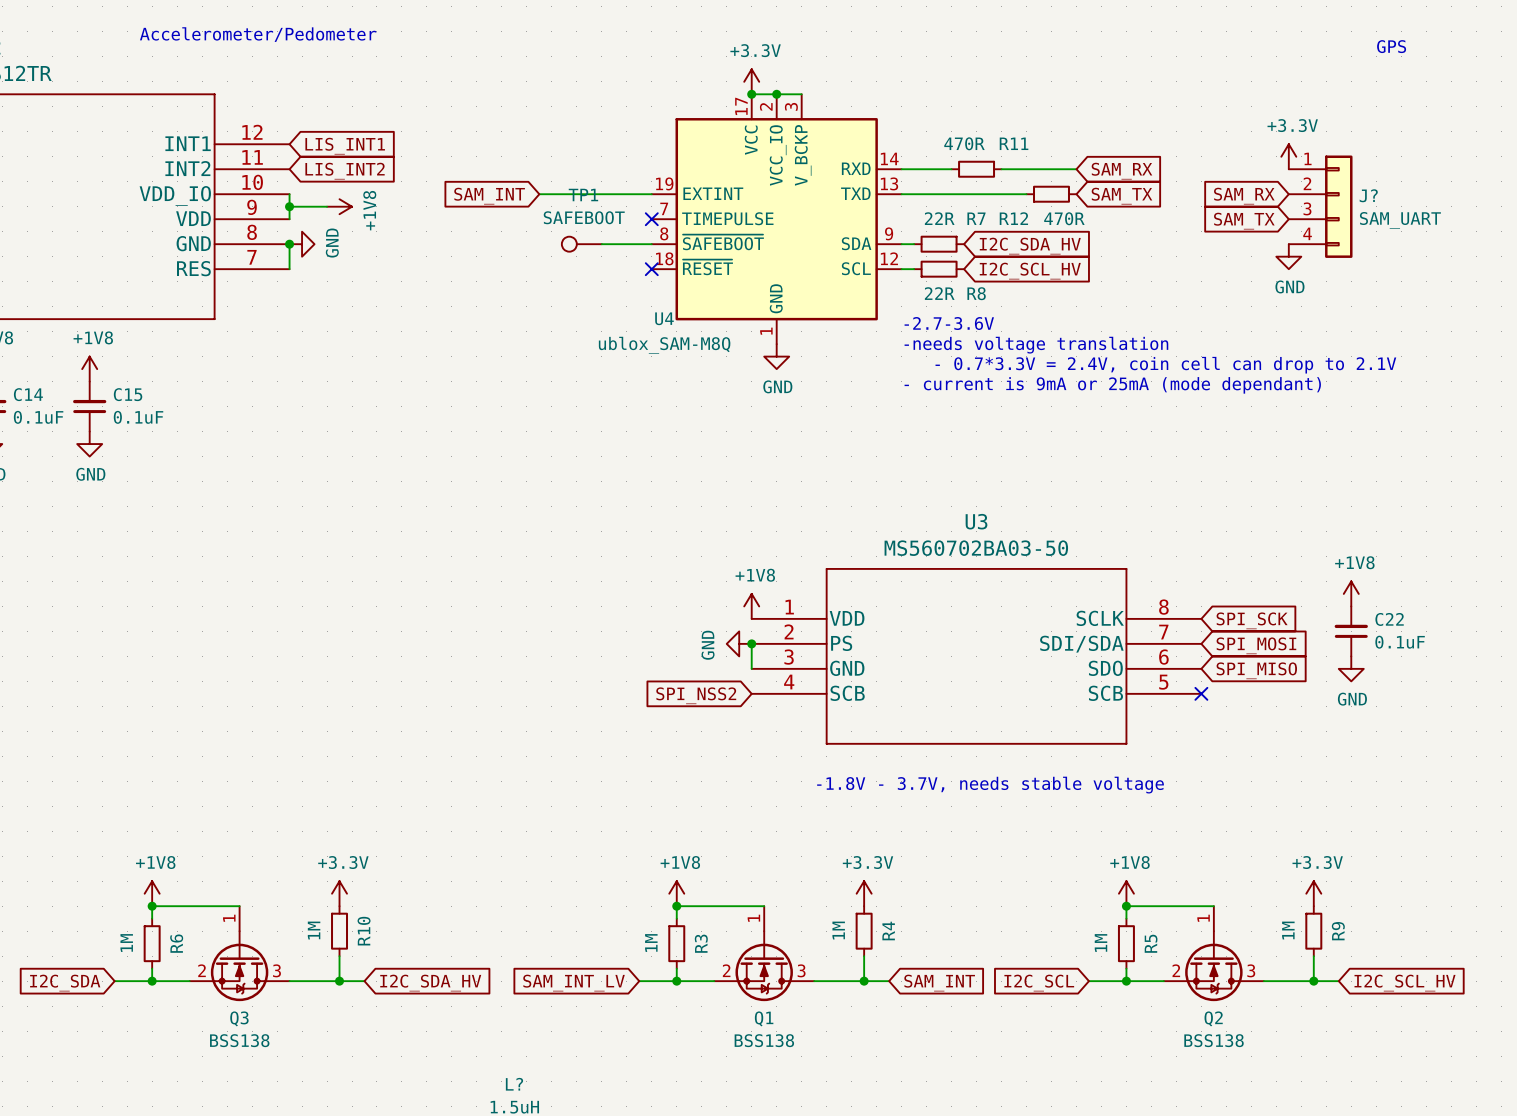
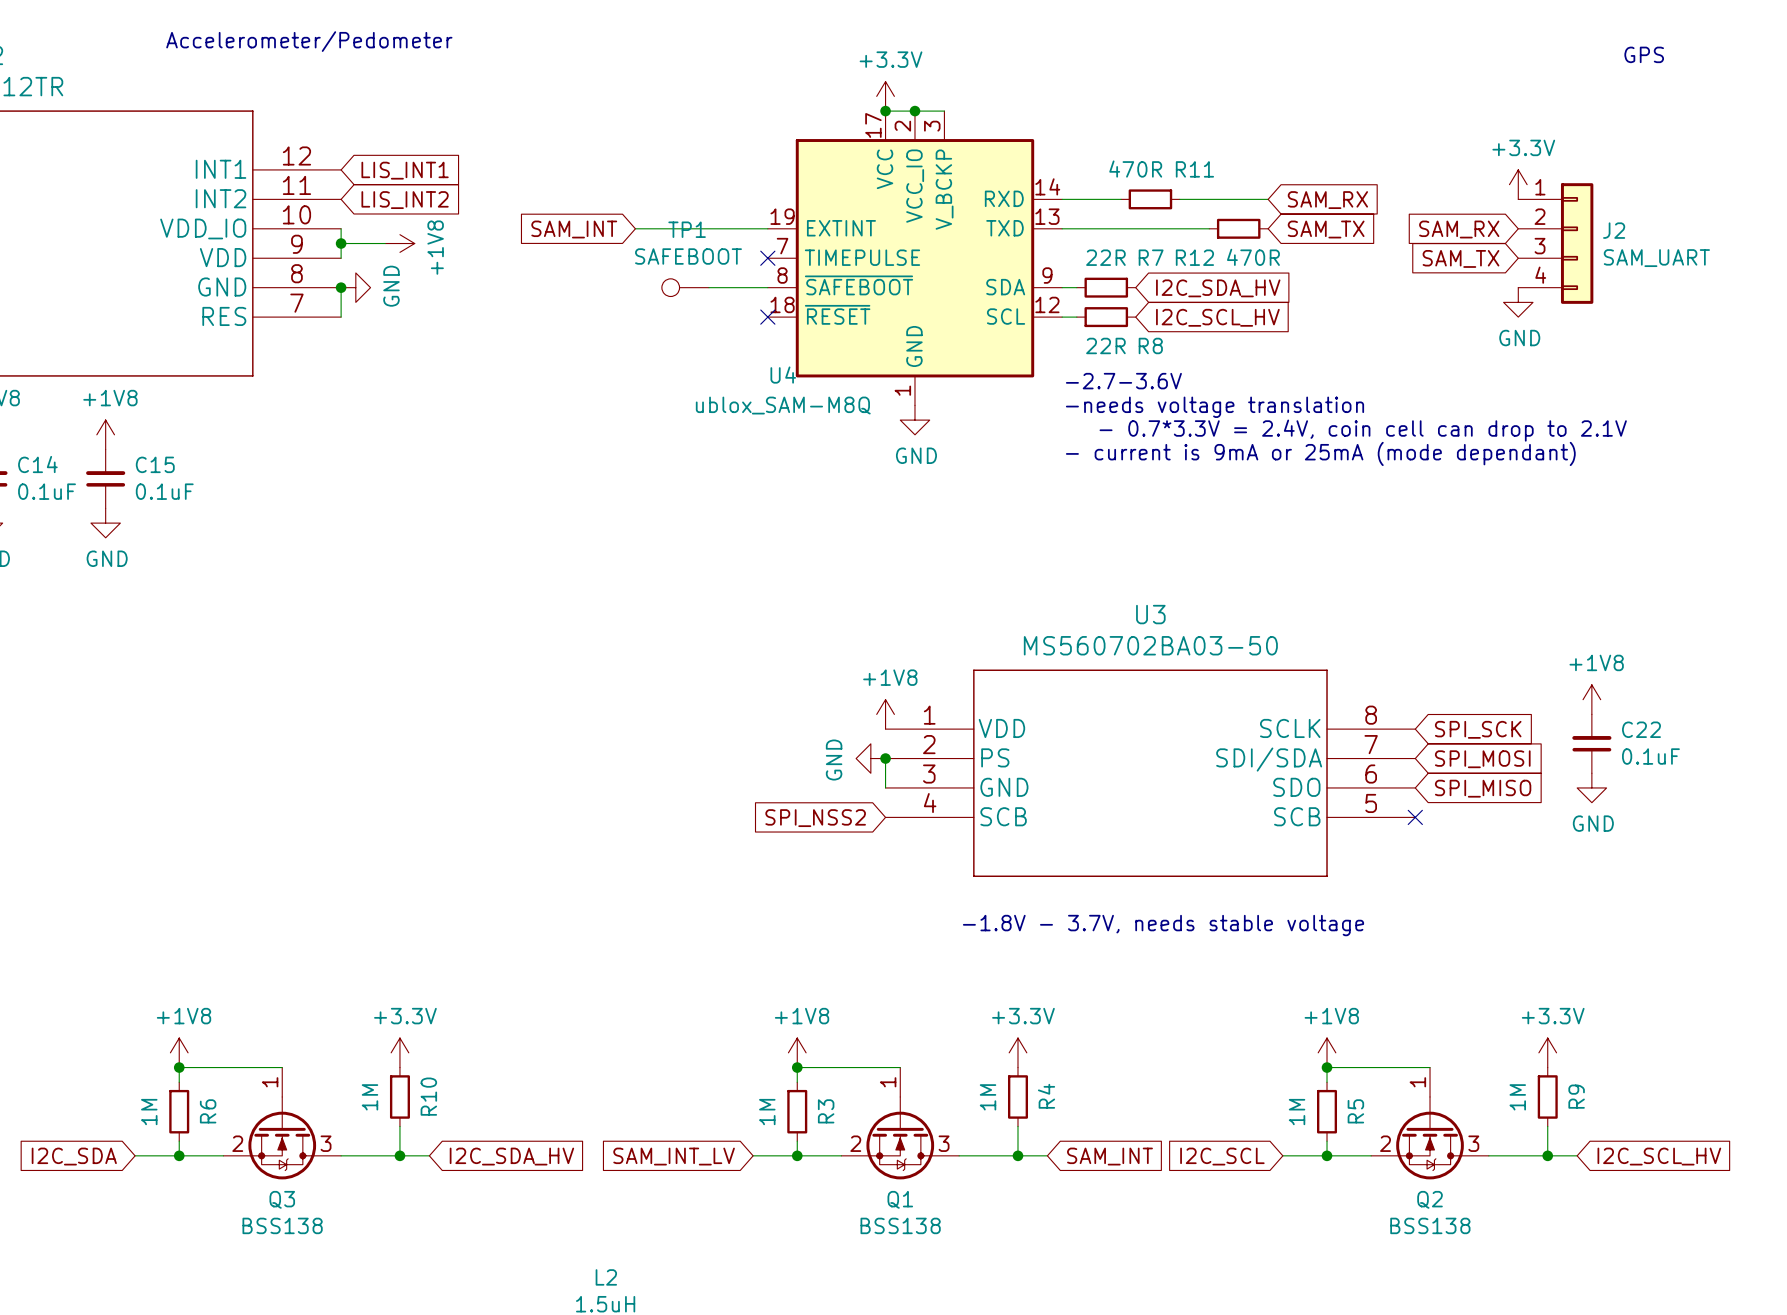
J? name: J? (1368, 195) -> J2 (1614, 230)
L? name: L? (514, 1084) -> L2 (606, 1277)

